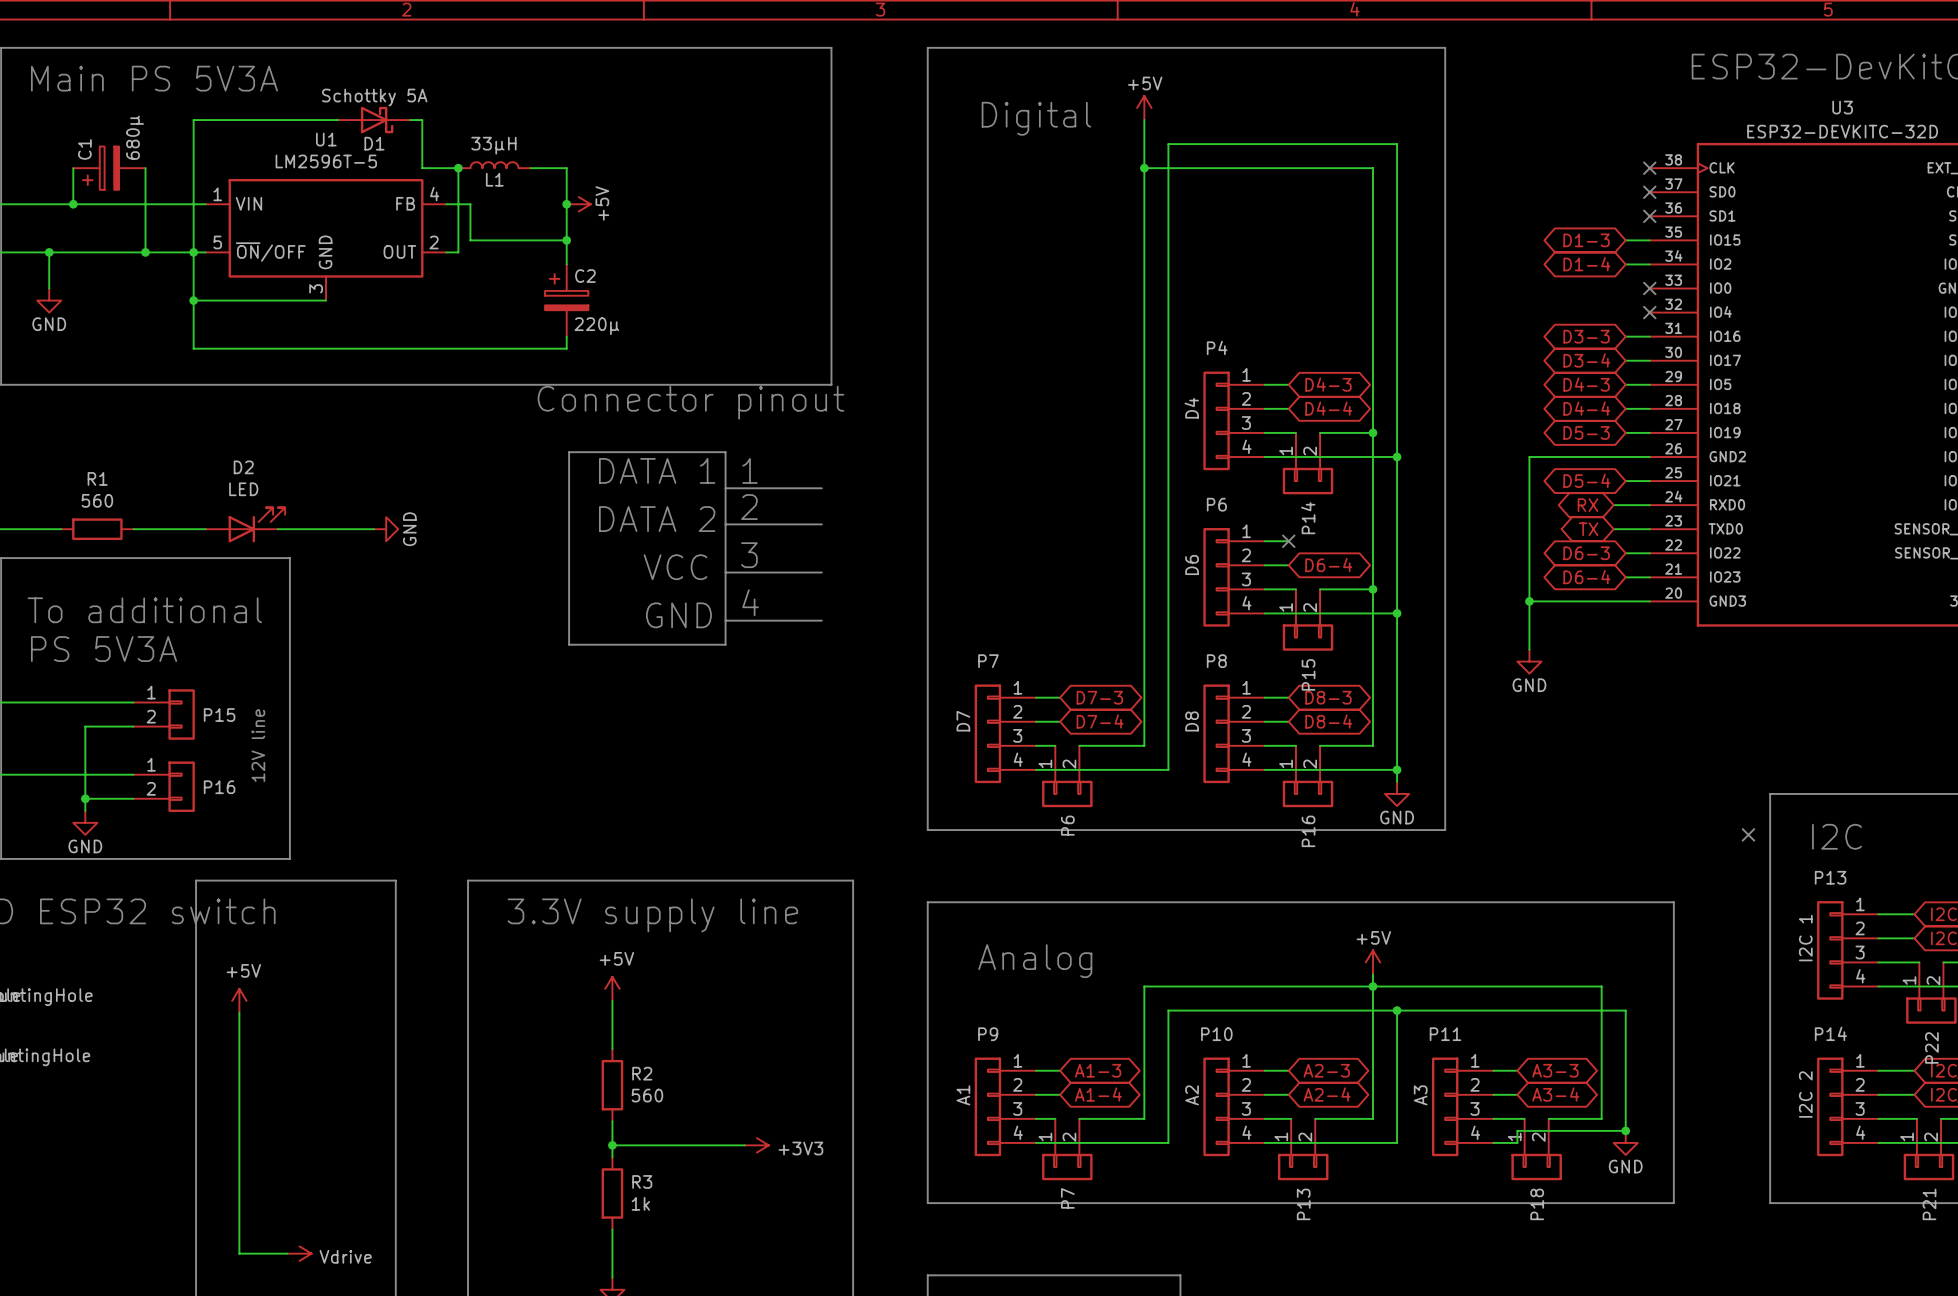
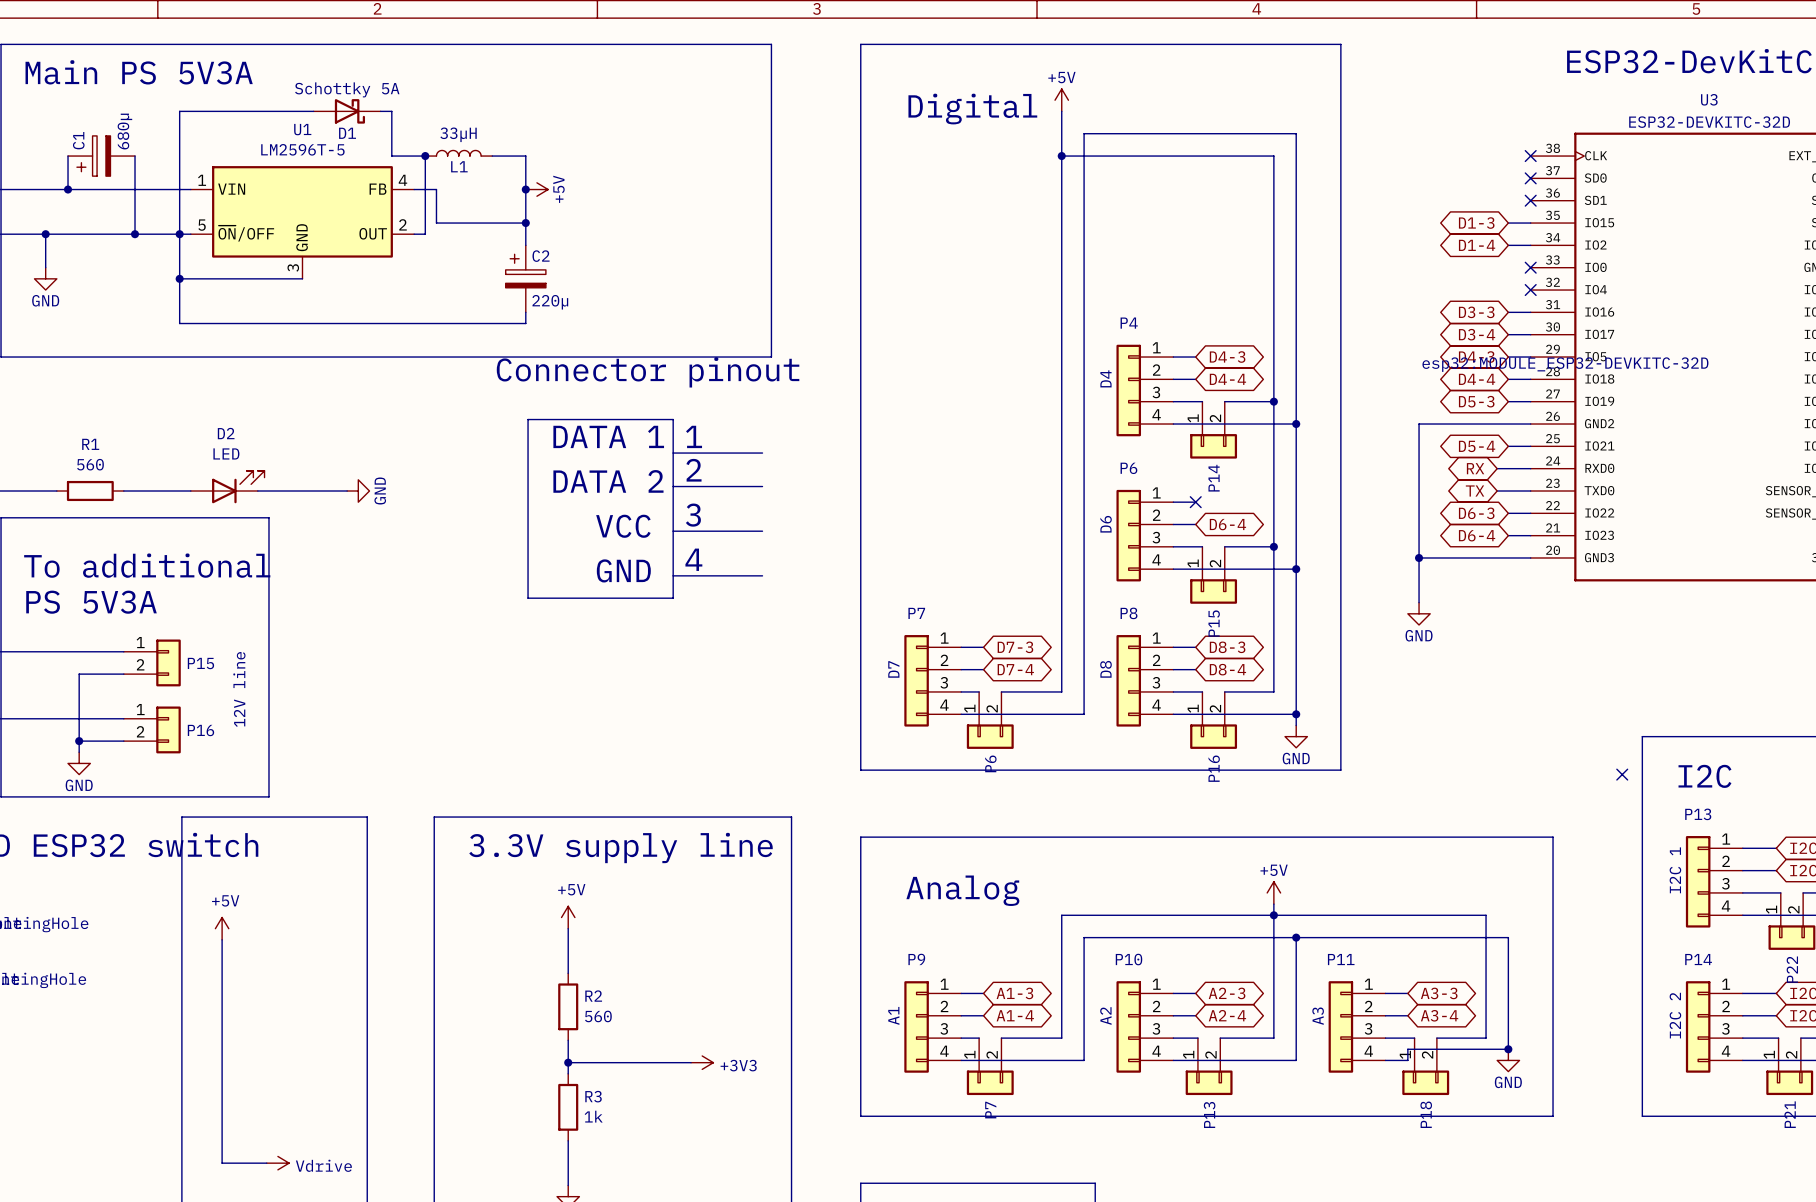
U3 text: none -> esp32:MODULE_ESP32-DEVKITC-32D (1565, 364)

